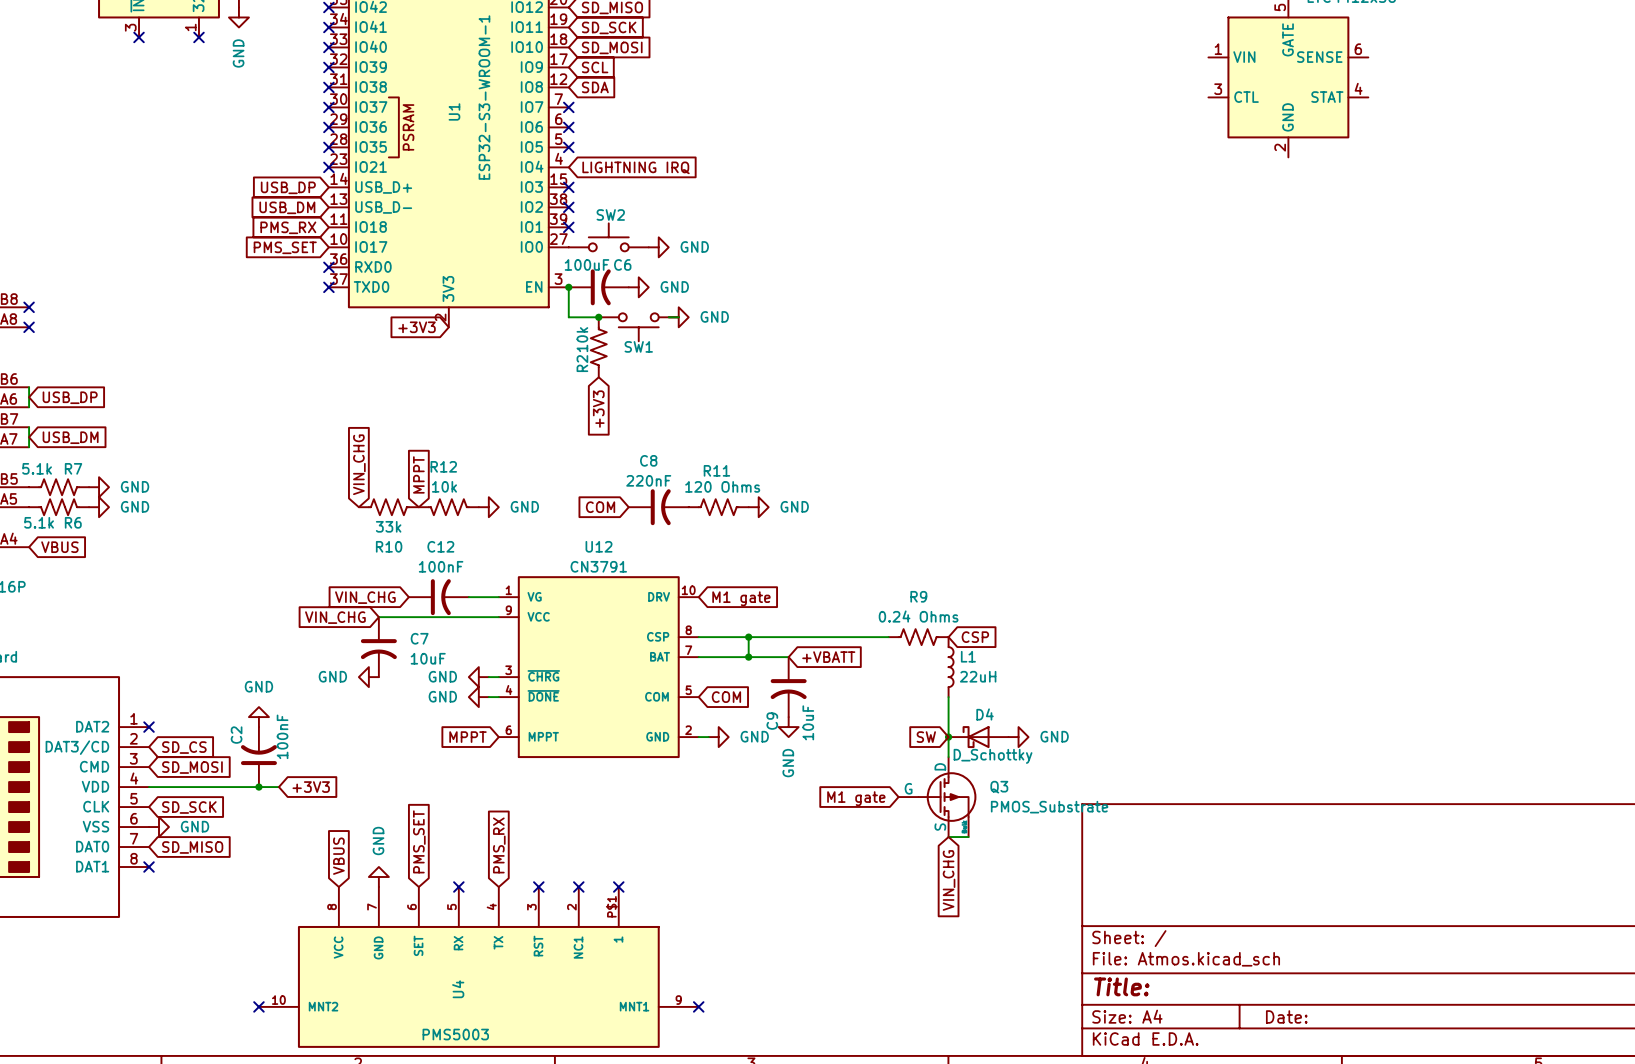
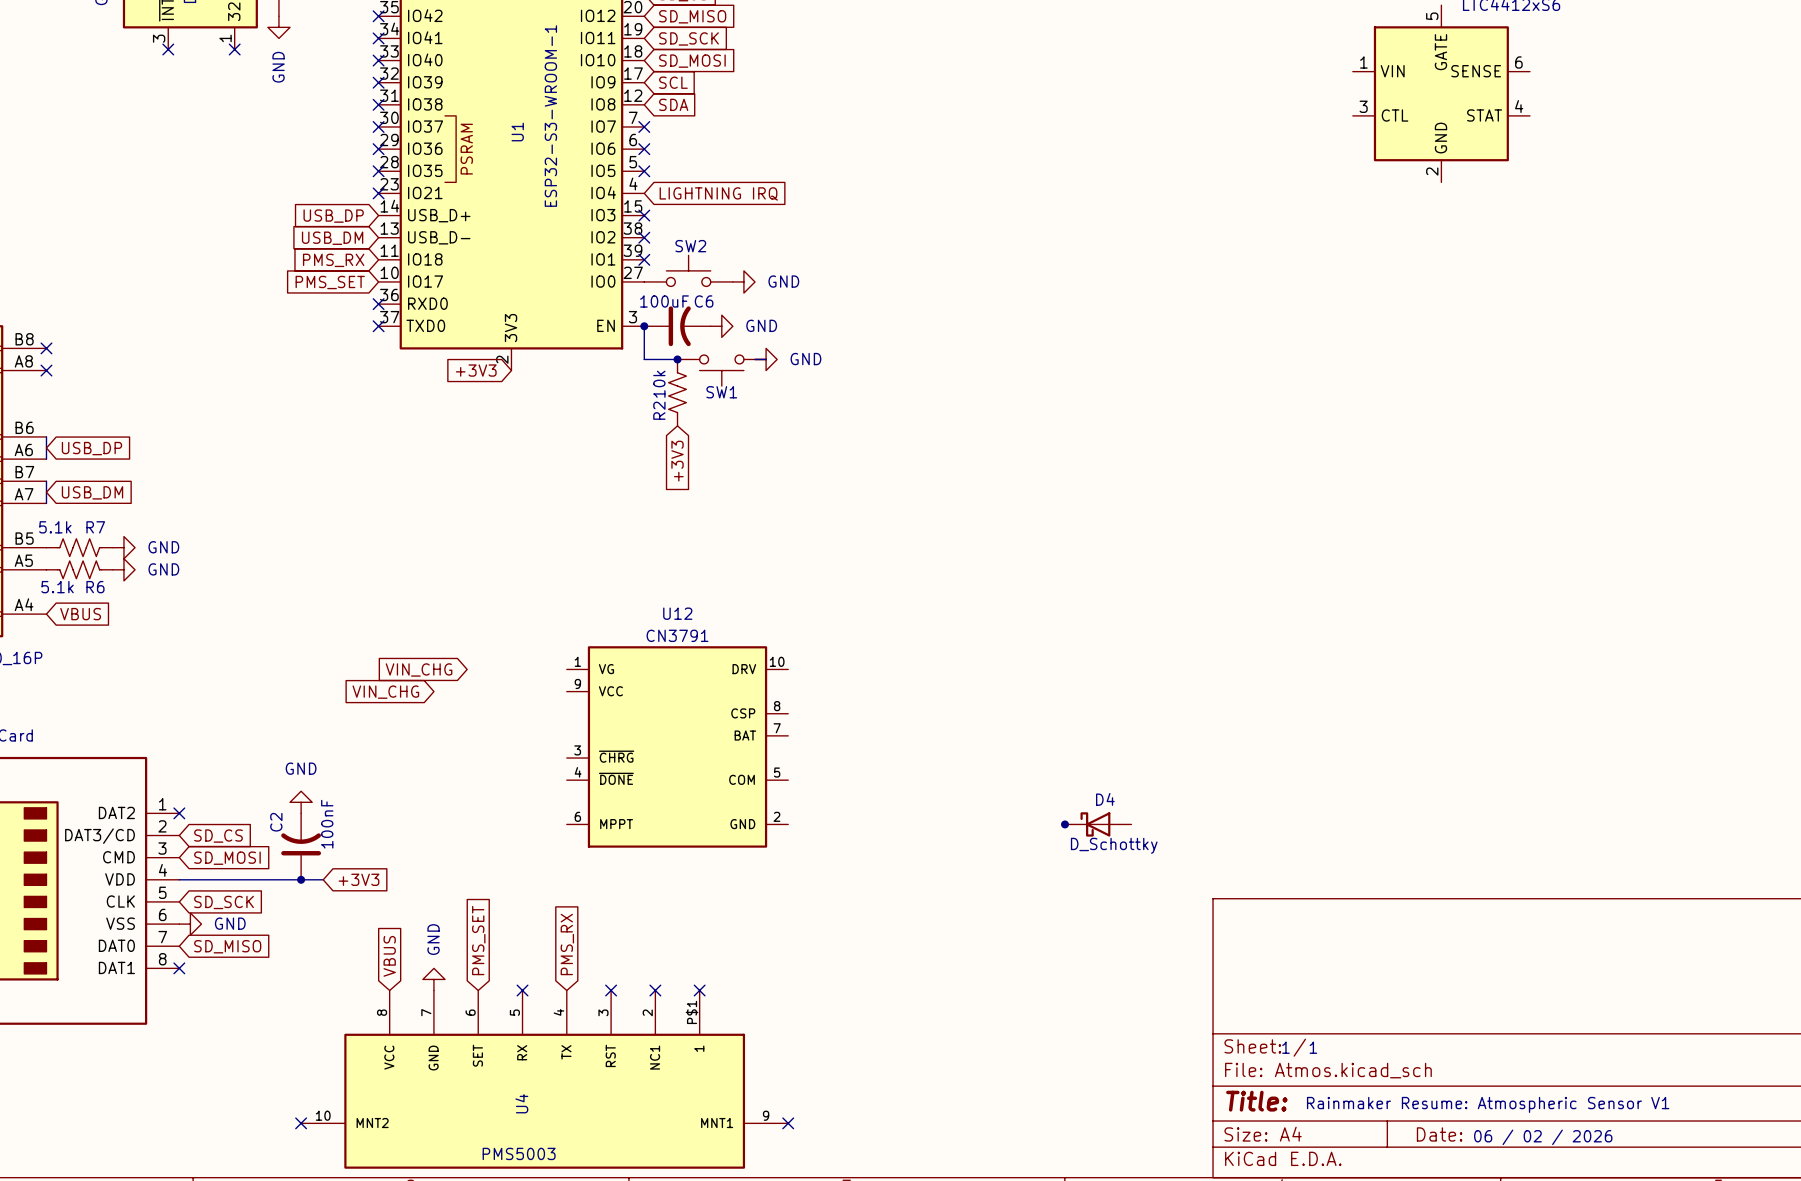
global label: VIN_CHG (359, 464) -> none
global label: MPPT (418, 474) -> none
R10: 33k (388, 507) -> none
R12: 10k (448, 507) -> none
power symbol: GND (488, 507) -> none
global label: COM (600, 507) -> none
C8: 220nF (658, 507) -> none
R11: 120 Ohms (718, 507) -> none
power symbol: GND (758, 507) -> none
C12: 100nF (438, 597) -> none
wire: (468, 597) (498, 597) -> none
global label: M1 gate (741, 598) -> none
wire: (378, 617) (498, 617) -> none
wire: (698, 637) (888, 637) -> none
wire: (748, 637) (748, 657) -> none
junction: (748, 637) -> none
R9: 0.24 Ohms (918, 637) -> none
global label: CSP (975, 637) -> none
C7: 10uF (378, 647) -> none
wire: (698, 657) (788, 657) -> none
junction: (748, 657) -> none
global label: +VBATT (828, 657) -> none
L1: 22uH (951, 667) -> none
power symbol: GND (368, 677) -> none
power symbol: GND (478, 677) -> none
wire: (488, 677) (498, 677) -> none
C9: 10uF (788, 687) -> none
power symbol: GND (478, 697) -> none
wire: (488, 697) (498, 697) -> none
global label: COM (726, 697) -> none
wire: (948, 697) (948, 757) -> none
power symbol: GND (788, 727) -> none
global label: MPPT (467, 737) -> none
wire: (698, 737) (708, 737) -> none
power symbol: GND (718, 737) -> none
global label: SW (926, 737) -> none
power symbol: GND (1018, 737) -> none
Q3: PMOS_Substrate (937, 797) -> none
global label: M1 gate (856, 798) -> none
wire: (948, 837) (968, 837) -> none
global label: VIN_CHG (949, 880) -> none
text: none -> 1 1 (1299, 1047)
text: none -> Rainmaker Resume: Atmospheric Sensor V1 (1488, 1104)
text: none -> 06 / 02 / 2026 (1543, 1137)

